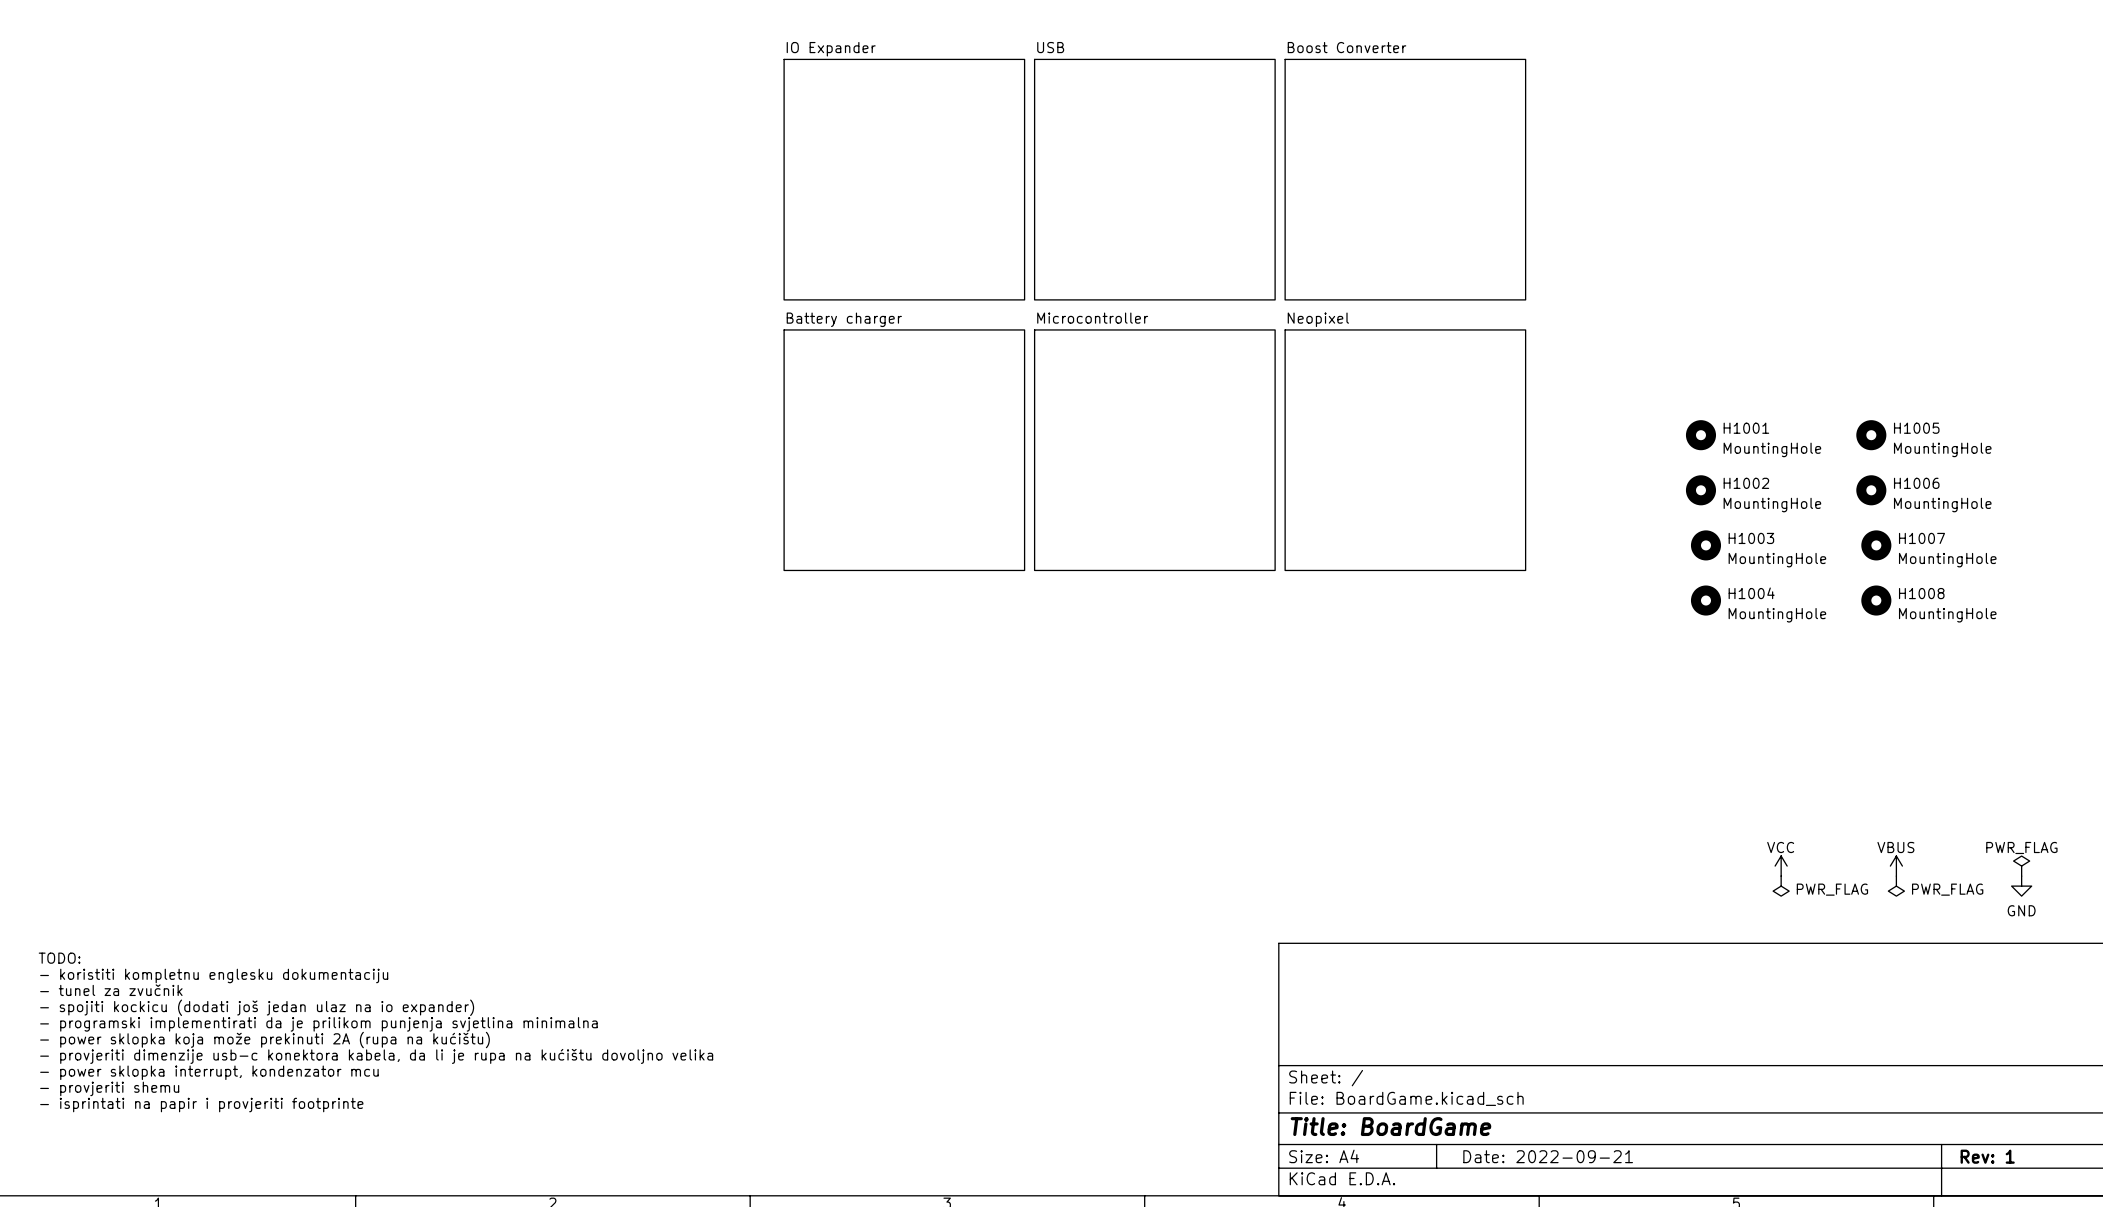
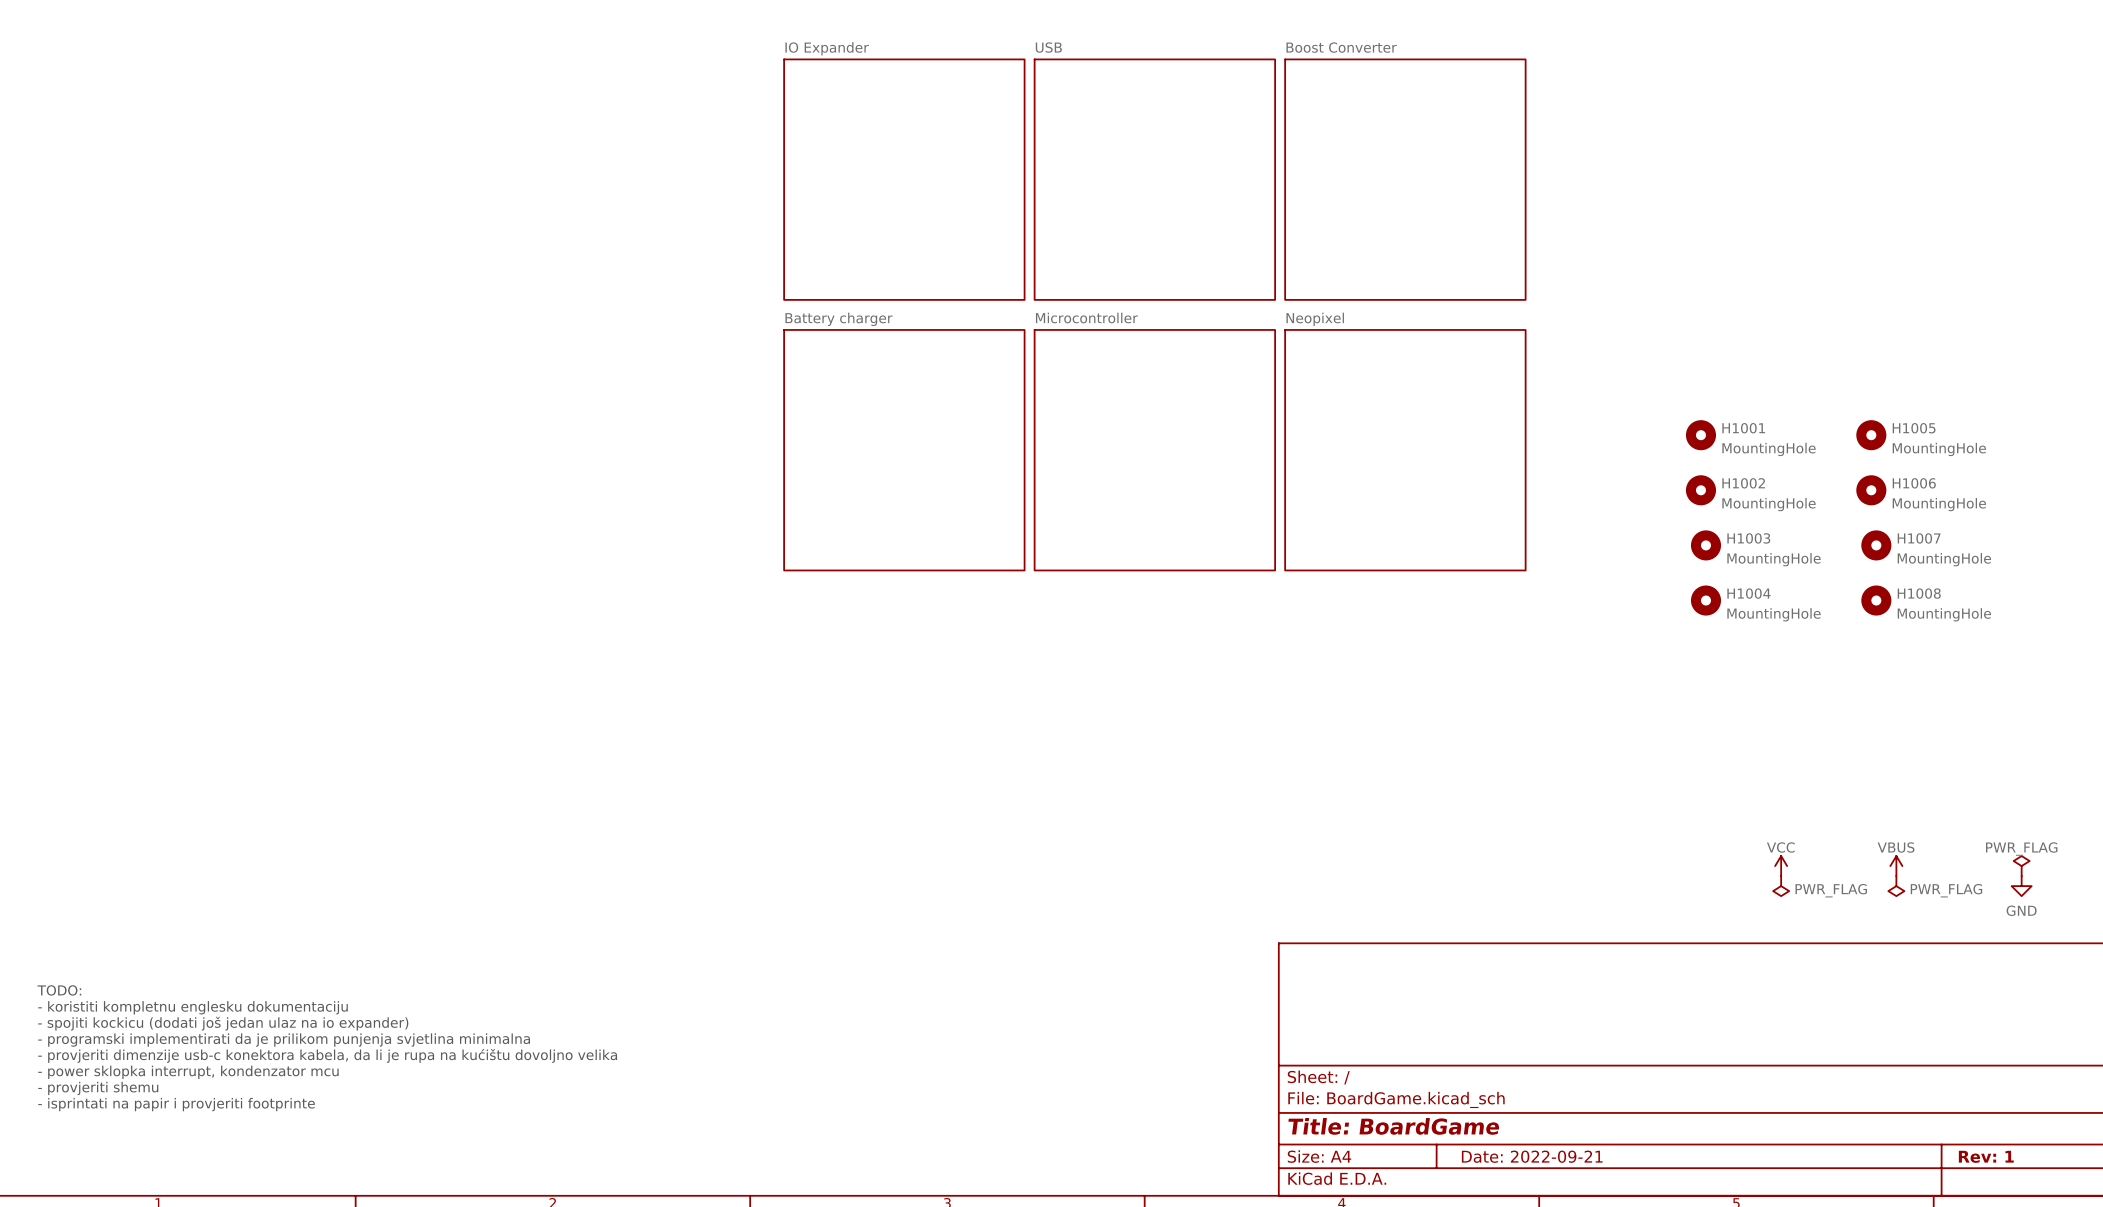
text: TODO: (59, 958) -> none
text: - koristiti kompletnu englesku dokumentaciju (214, 975) -> none
text: - tunel za zvučnik (111, 990) -> TODO: (59, 990)
text: - spojiti kockicu (dodati još jedan ulaz na io expander) (257, 1007) -> - koristiti kompletnu englesku dokumentaciju (193, 1007)
text: - programski implementirati da je prilikom punjenja svjetlina minimalna (318, 1024) -> - spojiti kockicu (dodati još jedan ulaz na io expander) (223, 1023)
text: - power sklopka koja može prekinuti 2A (rupa na kućištu) (265, 1040) -> - programski implementirati da je prilikom punjenja svjetlina minimalna (284, 1040)

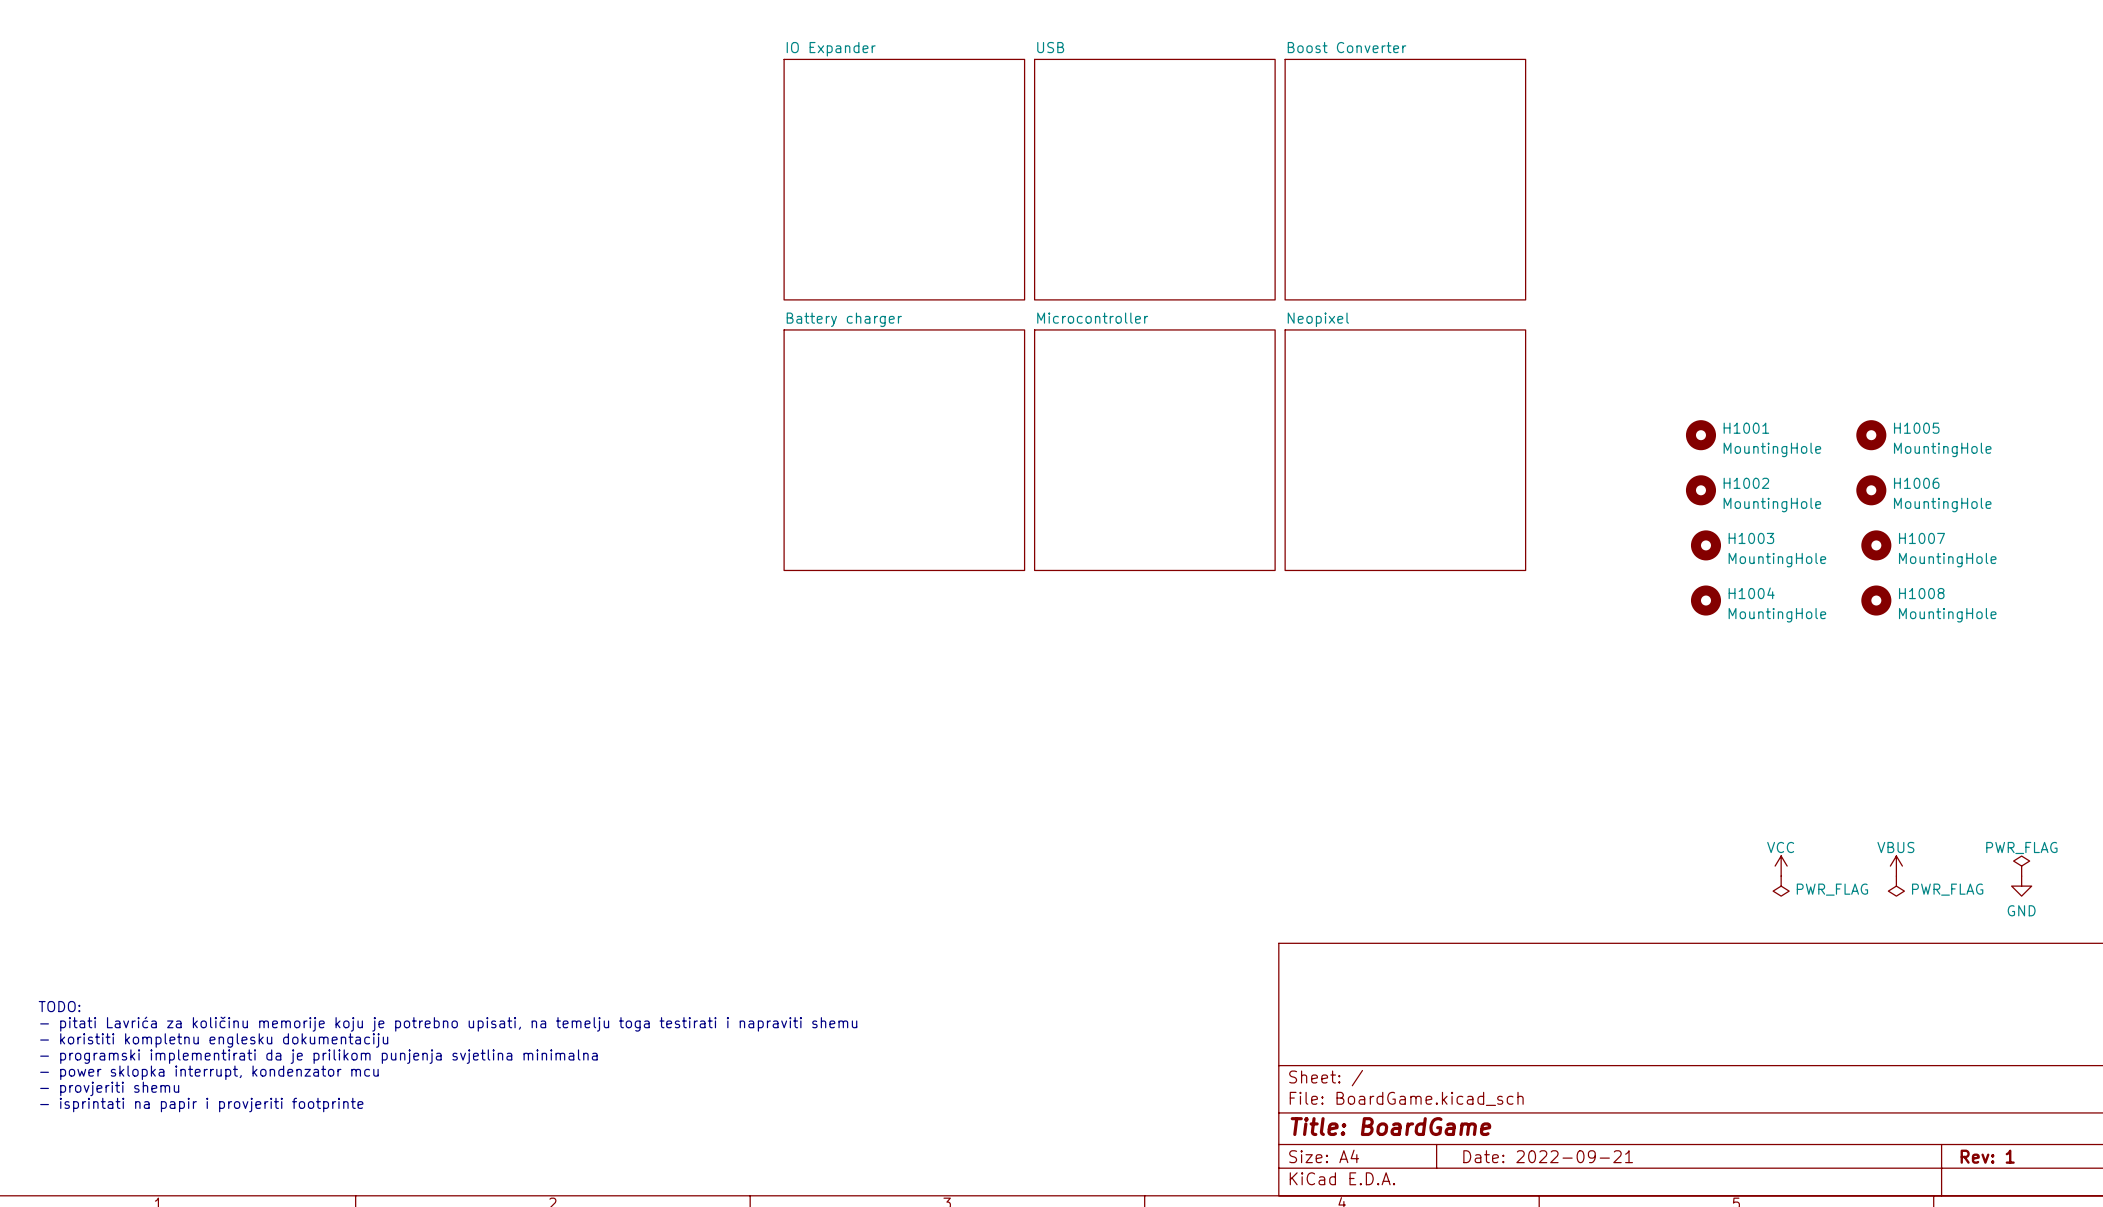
text: TODO: (59, 990) -> none
text: - koristiti kompletnu englesku dokumentaciju (193, 1007) -> TODO: (59, 1006)
text: - spojiti kockicu (dodati još jedan ulaz na io expander) (223, 1023) -> - pitati Lavrića za količinu memorije koju je potrebno upisati, na temelju toga testirati i napraviti shemu (448, 1024)
text: - programski implementirati da je prilikom punjenja svjetlina minimalna (284, 1040) -> - koristiti kompletnu englesku dokumentaciju (214, 1040)
text: - provjeriti dimenzije usb-c konektora kabela, da li je rupa na kućištu dovoljno velika (327, 1055) -> - programski implementirati da je prilikom punjenja svjetlina minimalna (318, 1056)

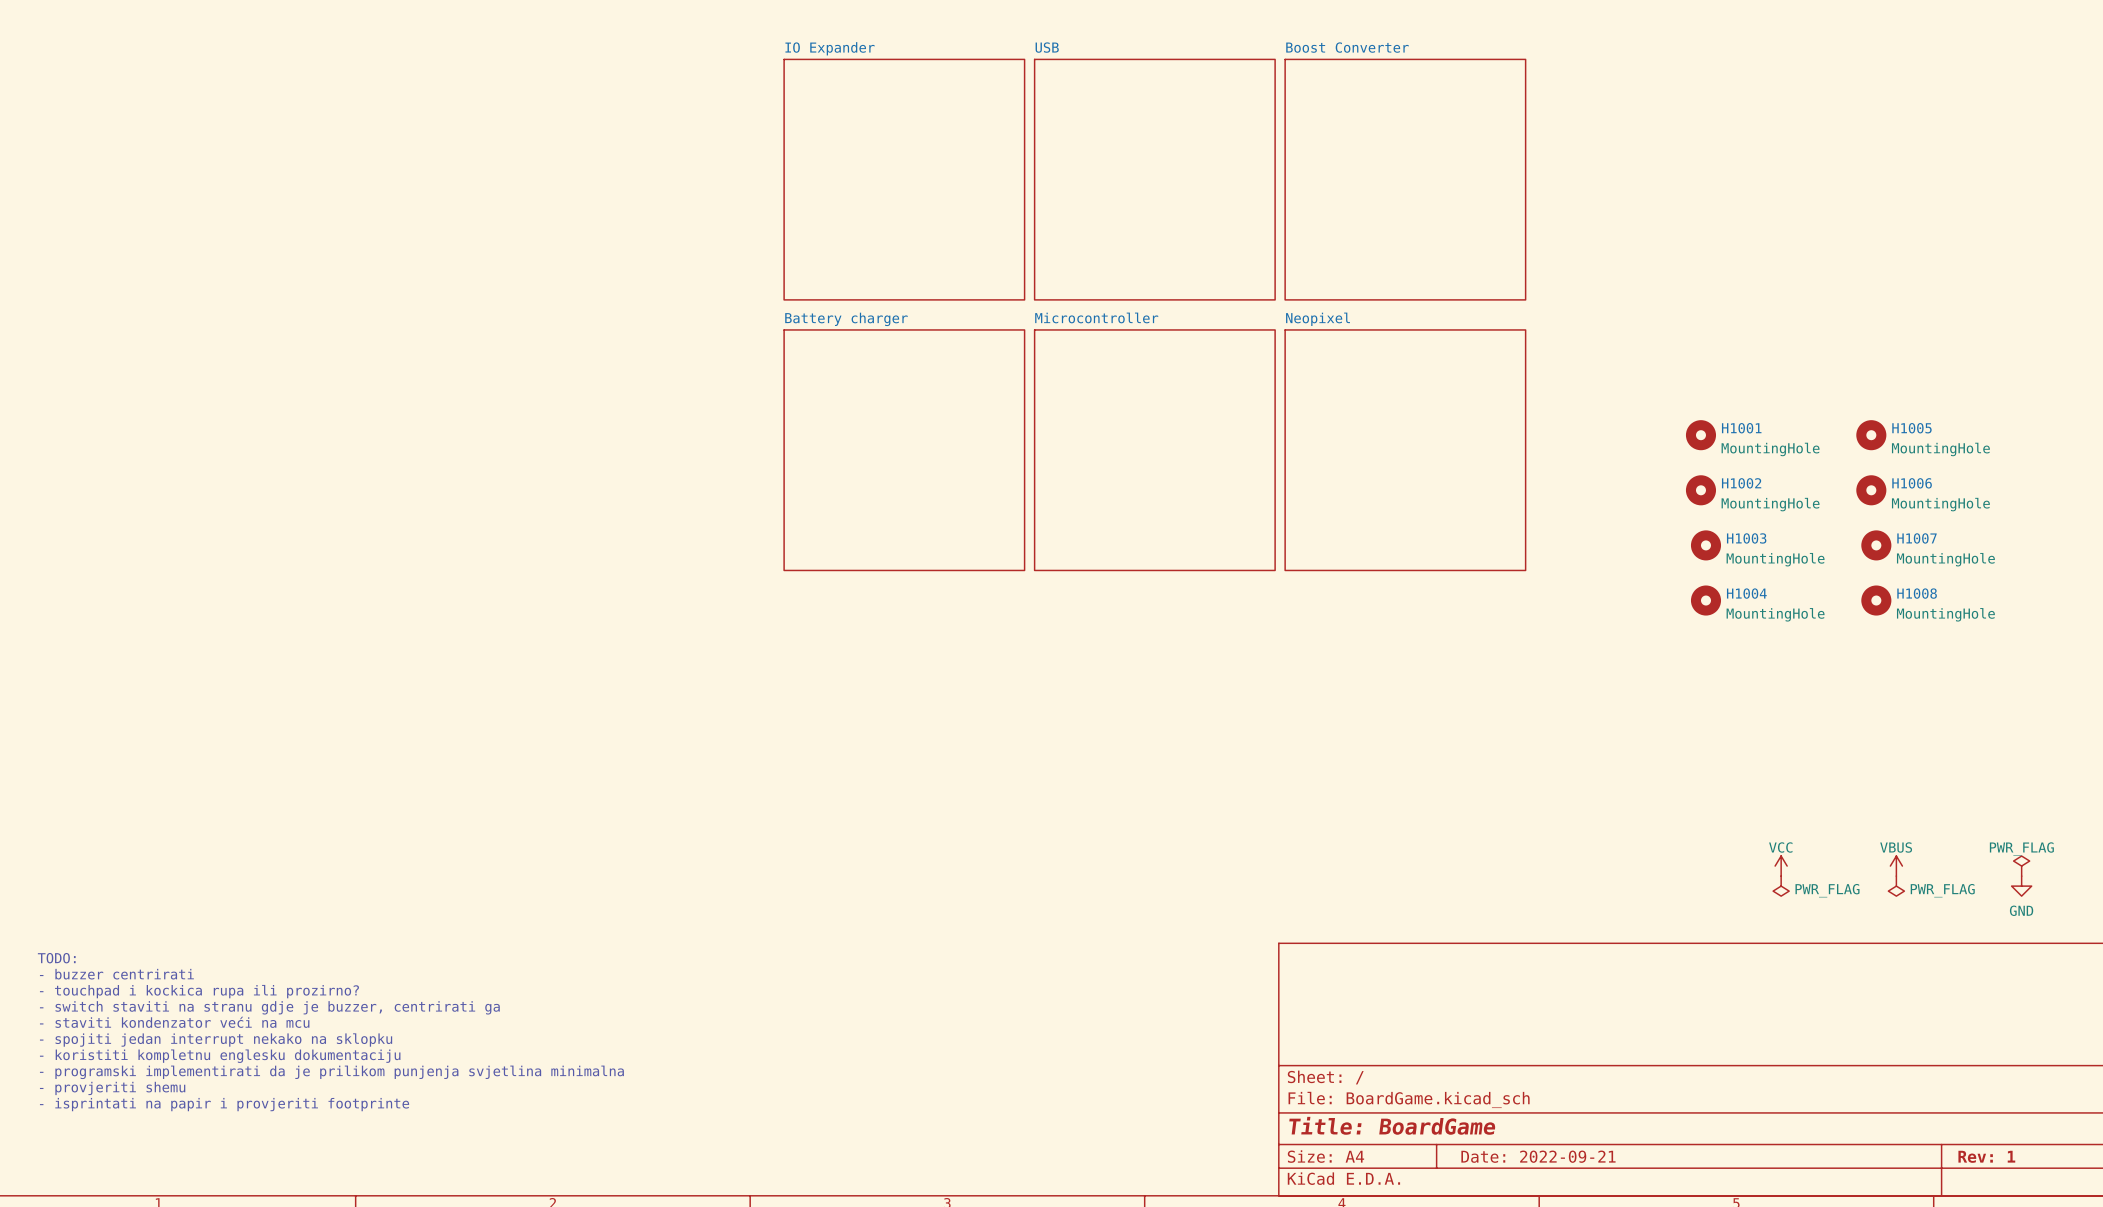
text: none -> TODO: (56, 958)
text: none -> - buzzer centrirati (116, 974)
text: none -> - touchpad i kockica rupa ili prozirno? (199, 991)
text: TODO: (59, 1006) -> - switch staviti na stranu gdje je buzzer, centrirati ga (269, 1007)
text: - pitati Lavrića za količinu memorije koju je potrebno upisati, na temelju toga testirati i napraviti shemu (448, 1024) -> - staviti kondenzator veći na mcu (174, 1022)
text: - koristiti kompletnu englesku dokumentaciju (214, 1040) -> - spojiti jedan interrupt nekako na sklopku (216, 1040)
text: - programski implementirati da je prilikom punjenja svjetlina minimalna (318, 1056) -> - koristiti kompletnu englesku dokumentaciju (220, 1056)
text: - power sklopka interrupt, kondenzator mcu (209, 1072) -> - programski implementirati da je prilikom punjenja svjetlina minimalna (331, 1072)

